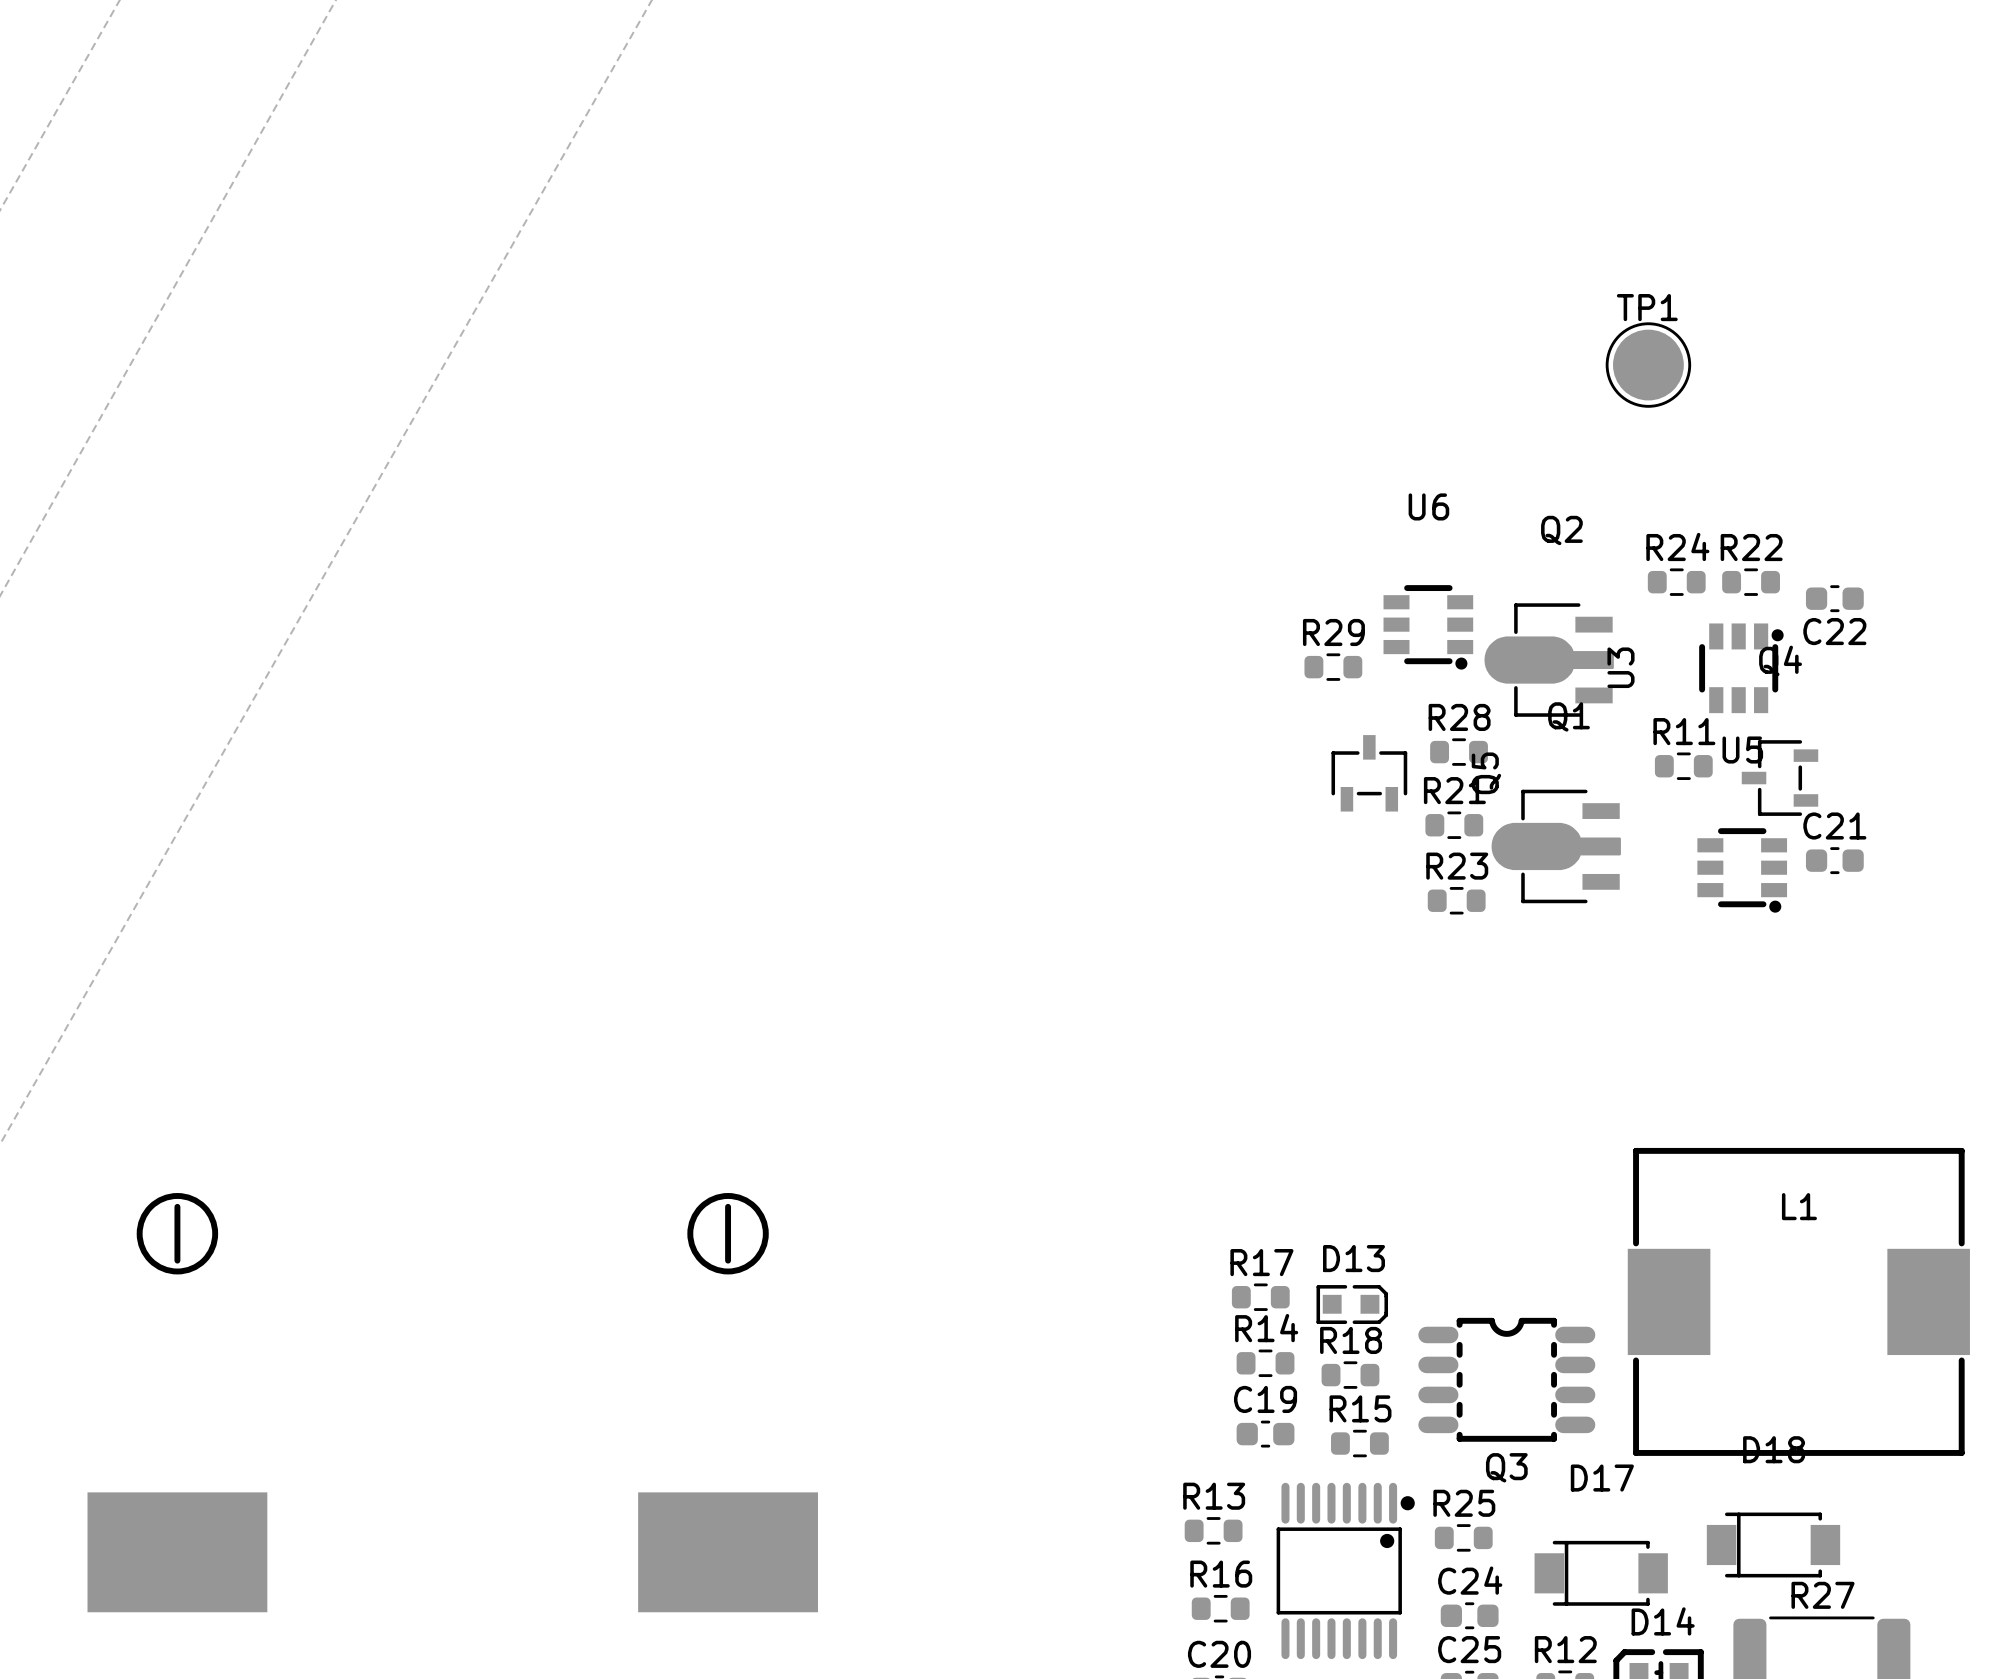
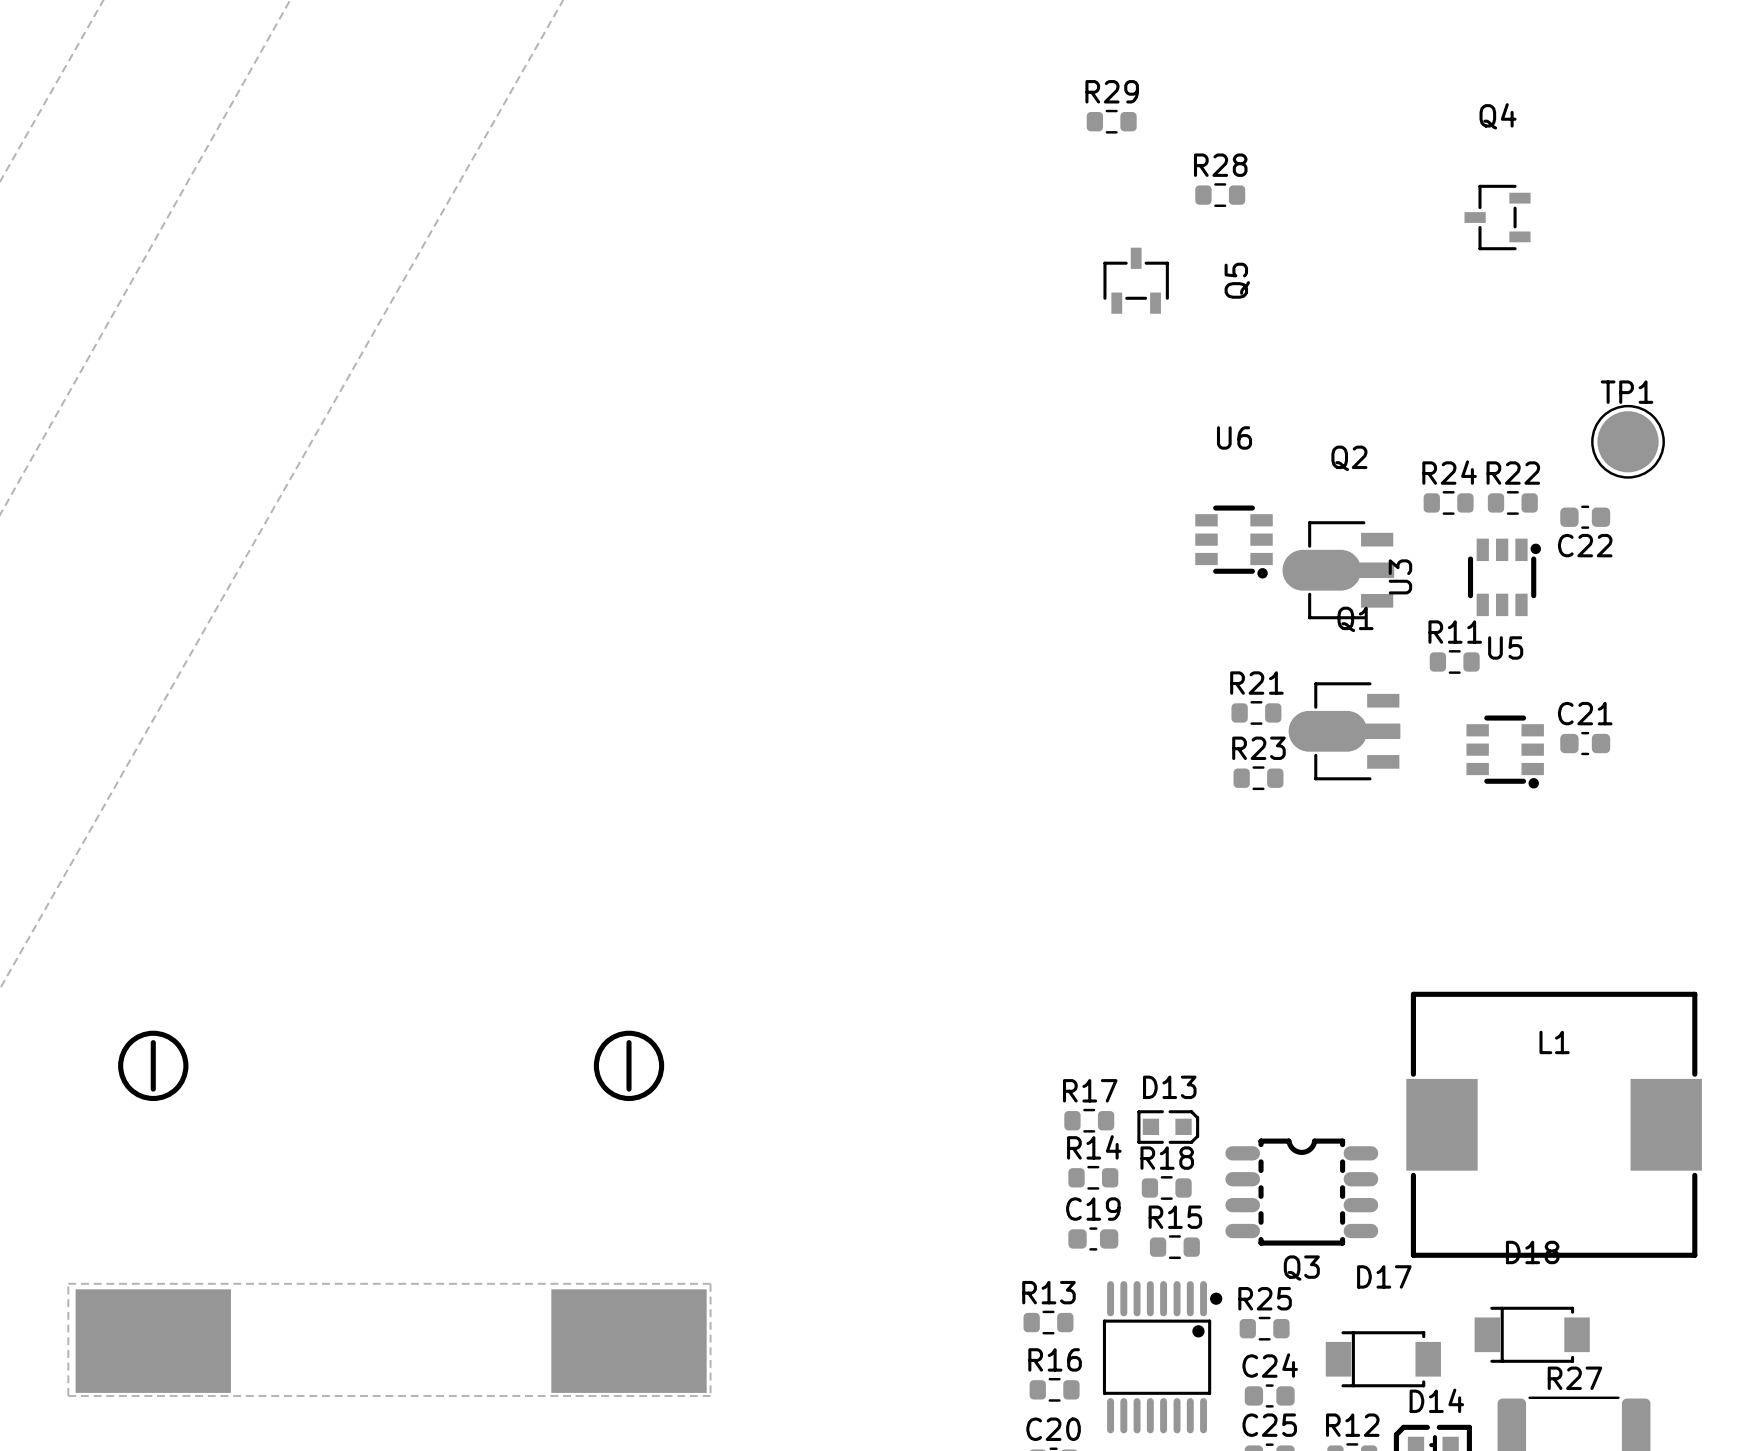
TP1 position: (1648, 365) -> (1628, 441)
R29 position: (1333, 667) -> (1111, 121)
R28 position: (1459, 752) -> (1220, 195)
Q5 position: (1369, 773) -> (1136, 280)
Q4 position: (1779, 778) -> (1497, 217)
zone outline: none -> (68, 1283) (710, 1283) (710, 1395) (68, 1395) (68, 1283)

